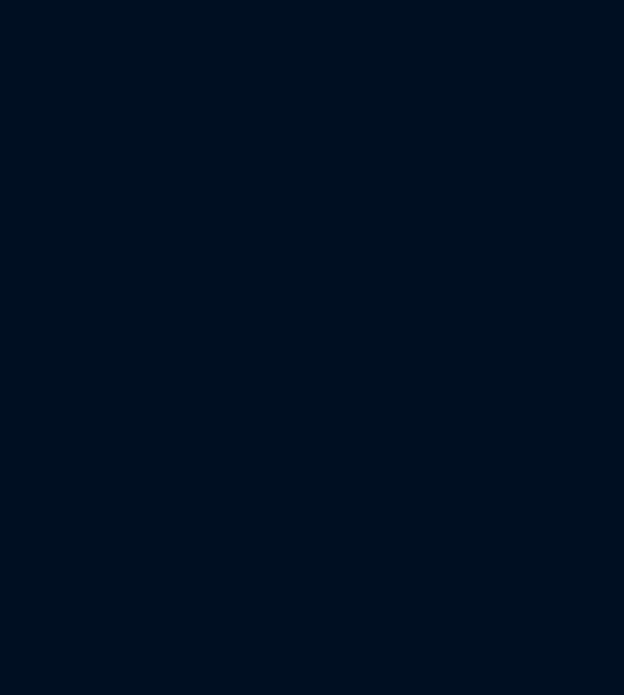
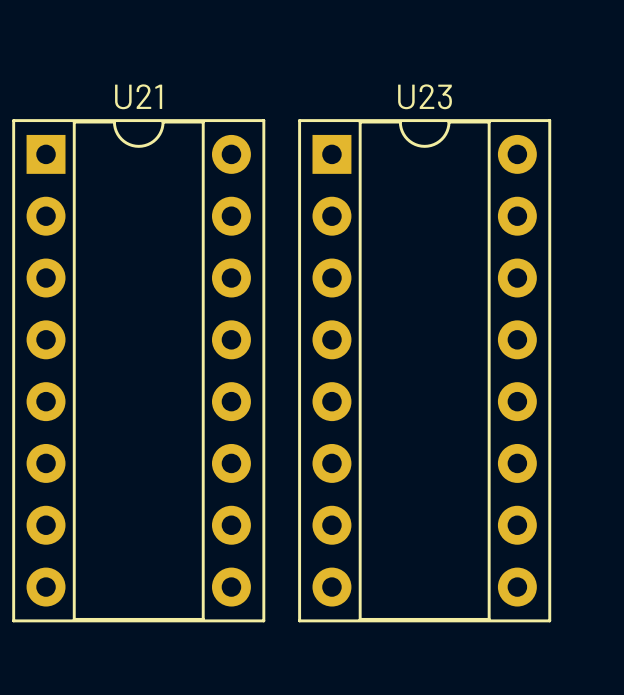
U21: none -> (138, 370)
U23: none -> (424, 370)

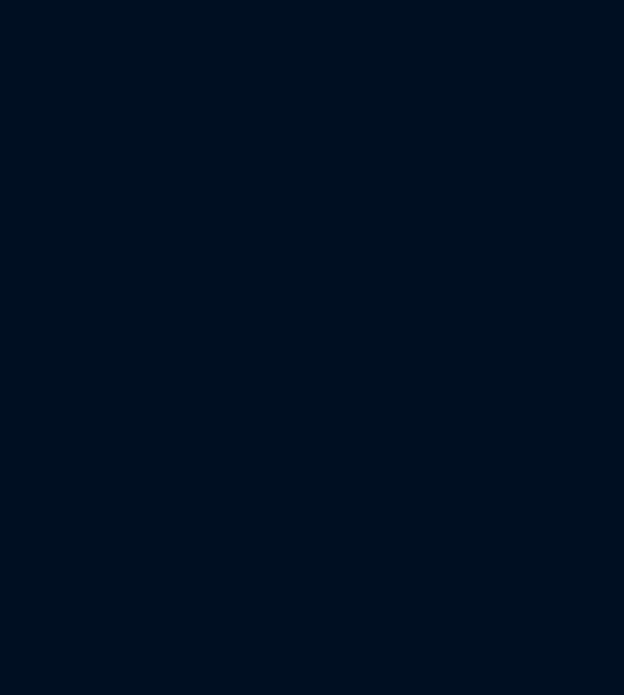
U21: (138, 370) -> none
U23: (424, 370) -> none

